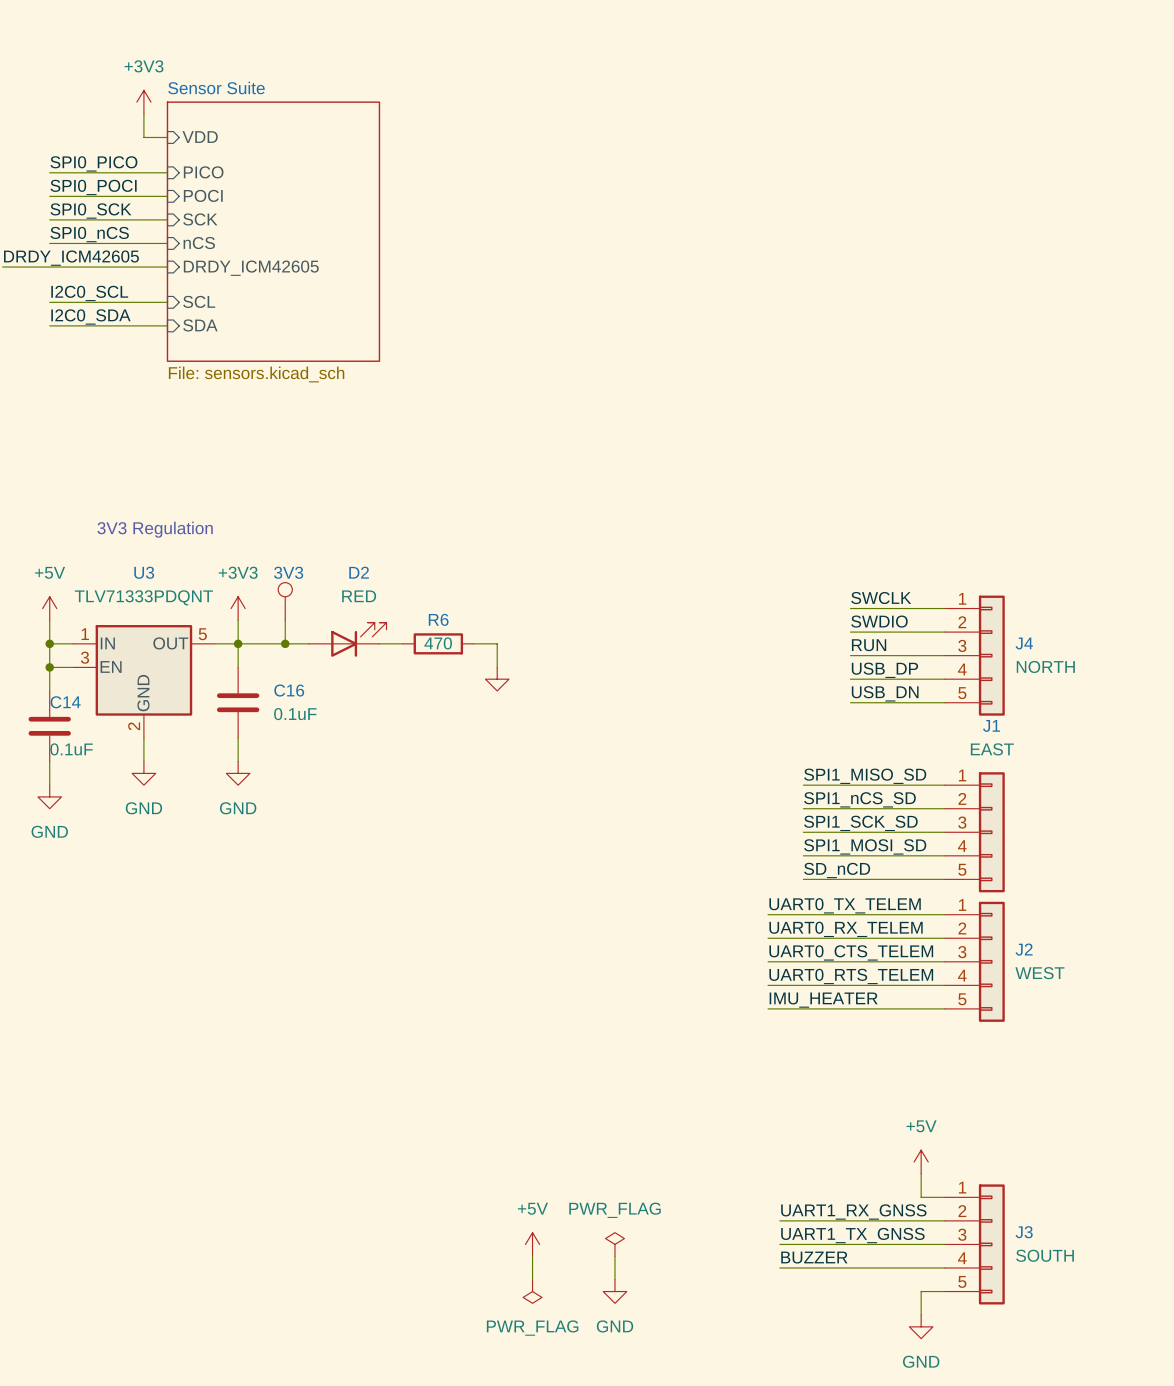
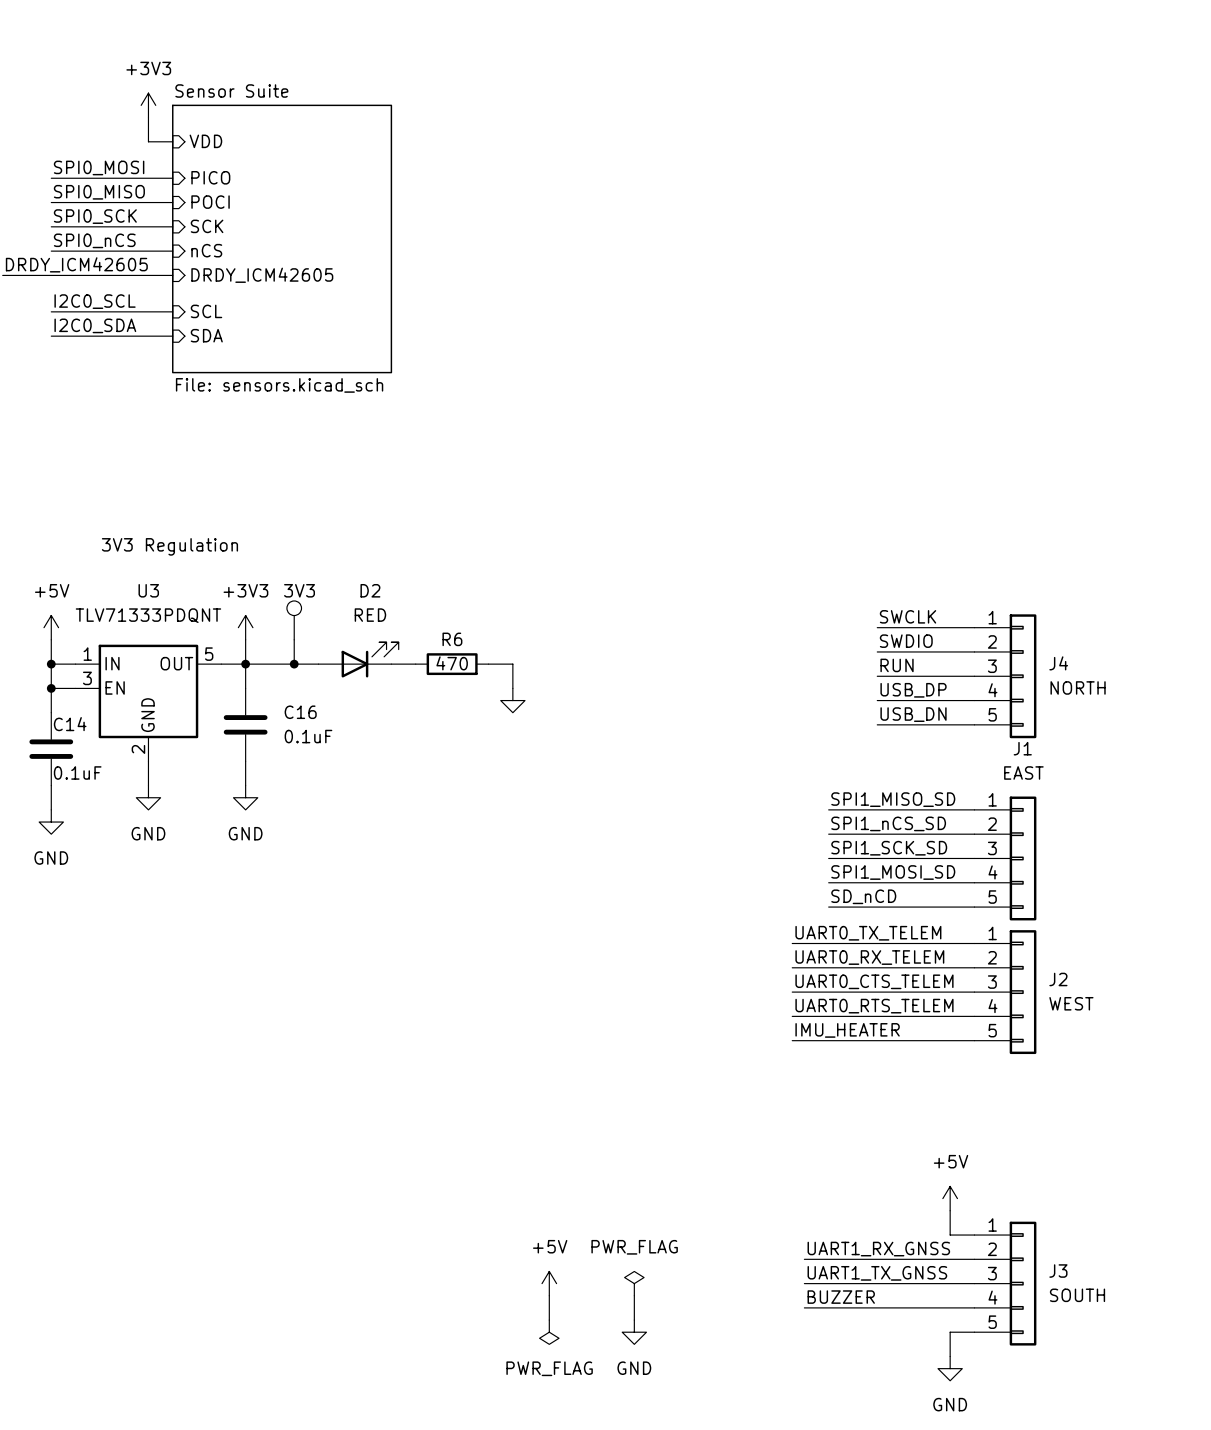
label: SPI0_PICO (93, 163) -> SPI0_MOSI (99, 167)
label: SPI0_POCI (93, 187) -> SPI0_MISO (99, 192)

